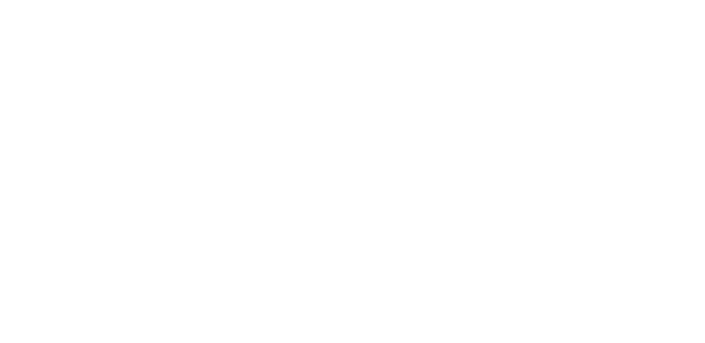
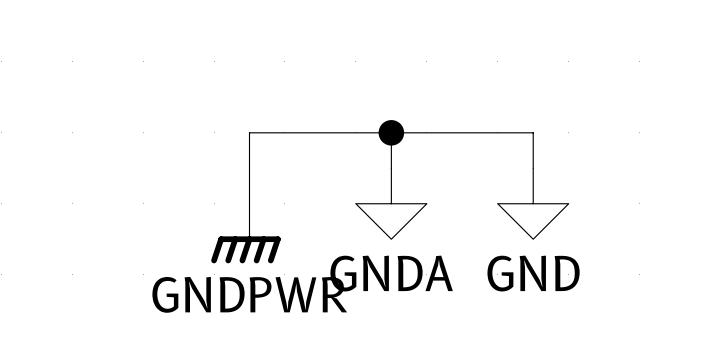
wire: none -> (391, 132) (391, 168)
junction: none -> (391, 132)
wire: none -> (533, 168) (533, 132) (249, 132) (249, 203)
power symbol: none -> GNDA (391, 203)
power symbol: none -> GND (533, 203)
power symbol: none -> GNDPWR (245, 233)

